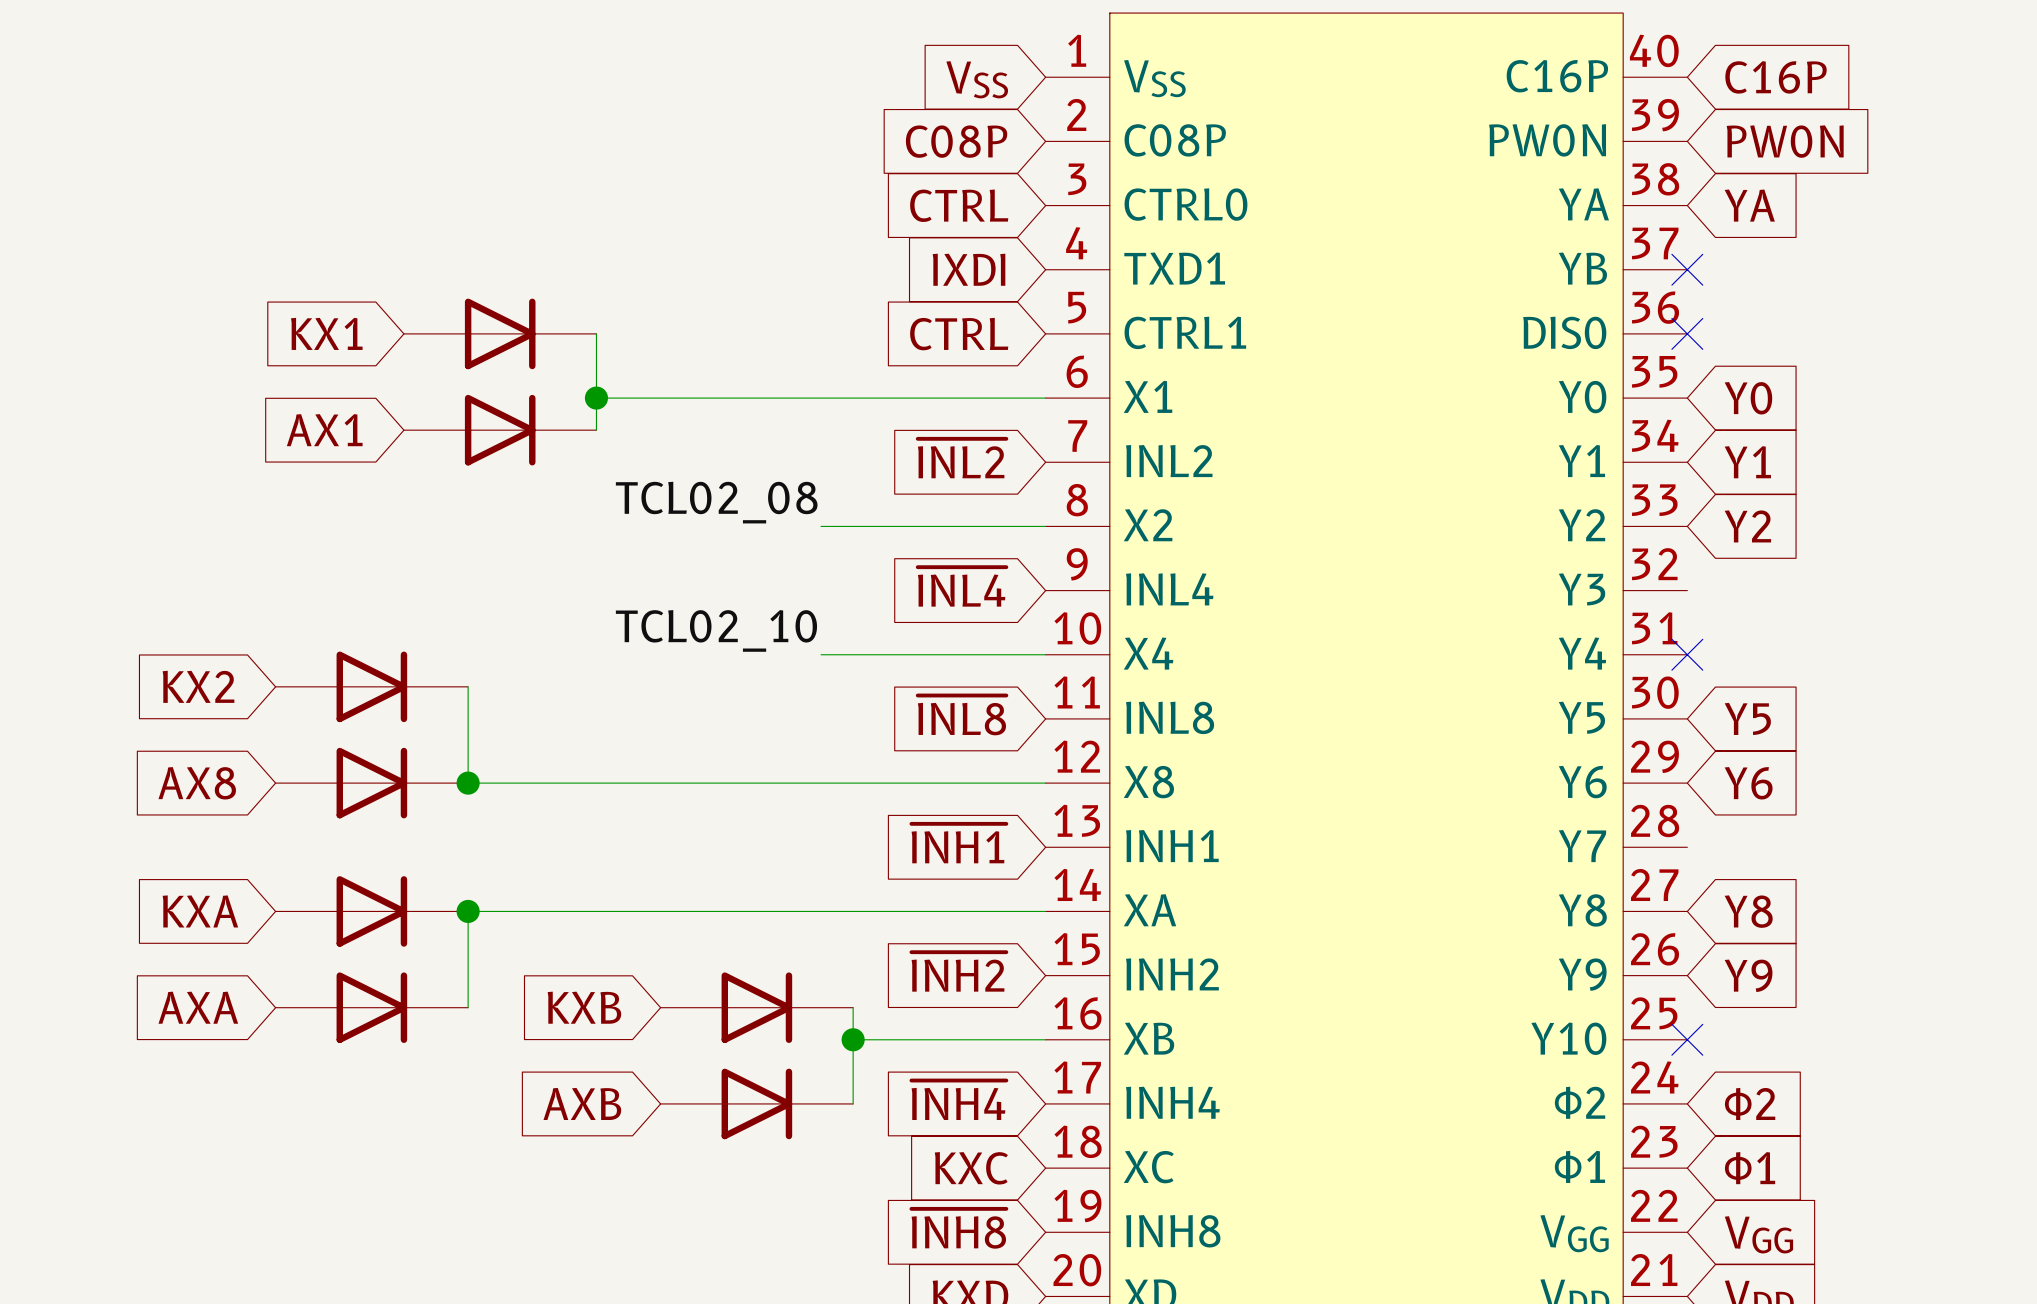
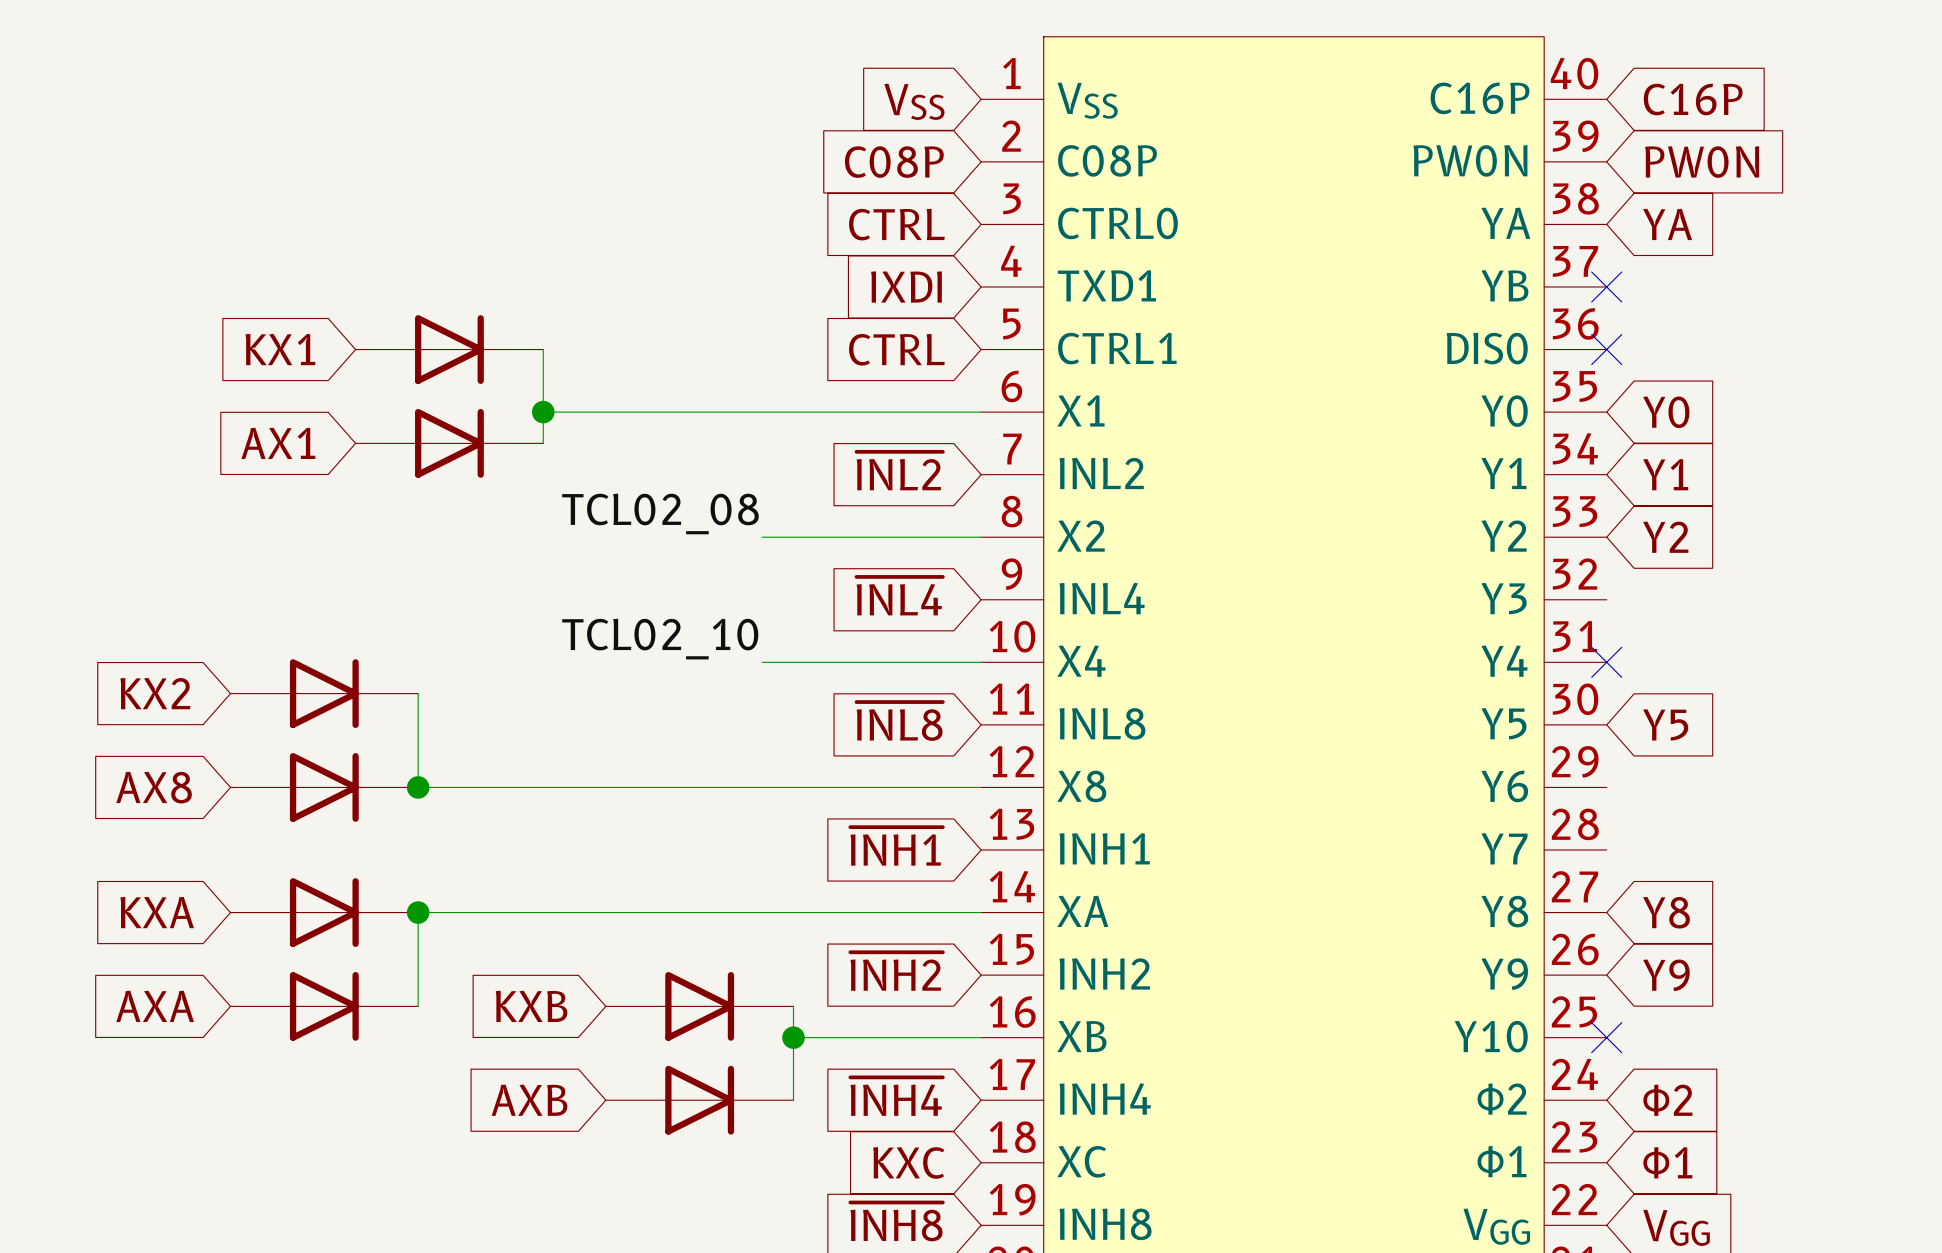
global label: Y6 (1748, 783) -> none

